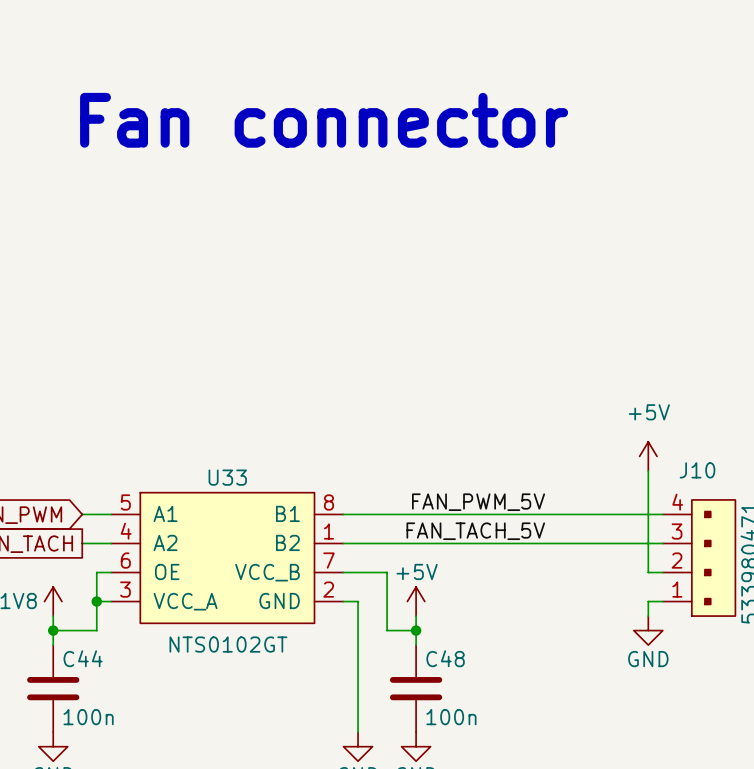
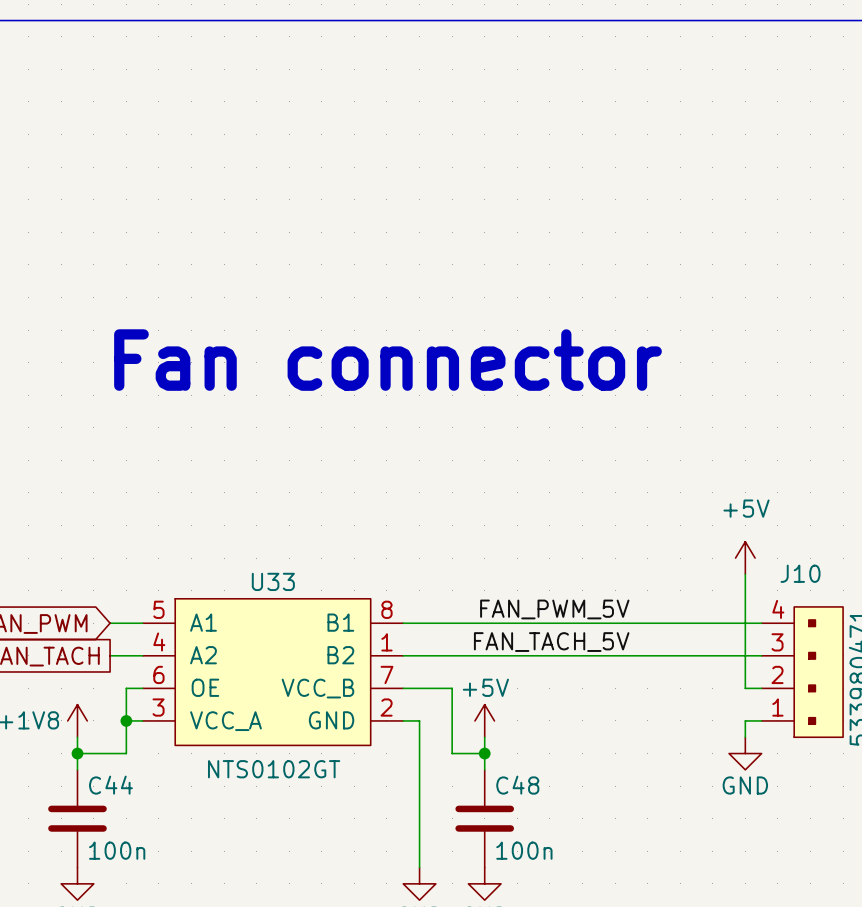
text position: Fan connector (324, 120) -> Fan connector (387, 360)

